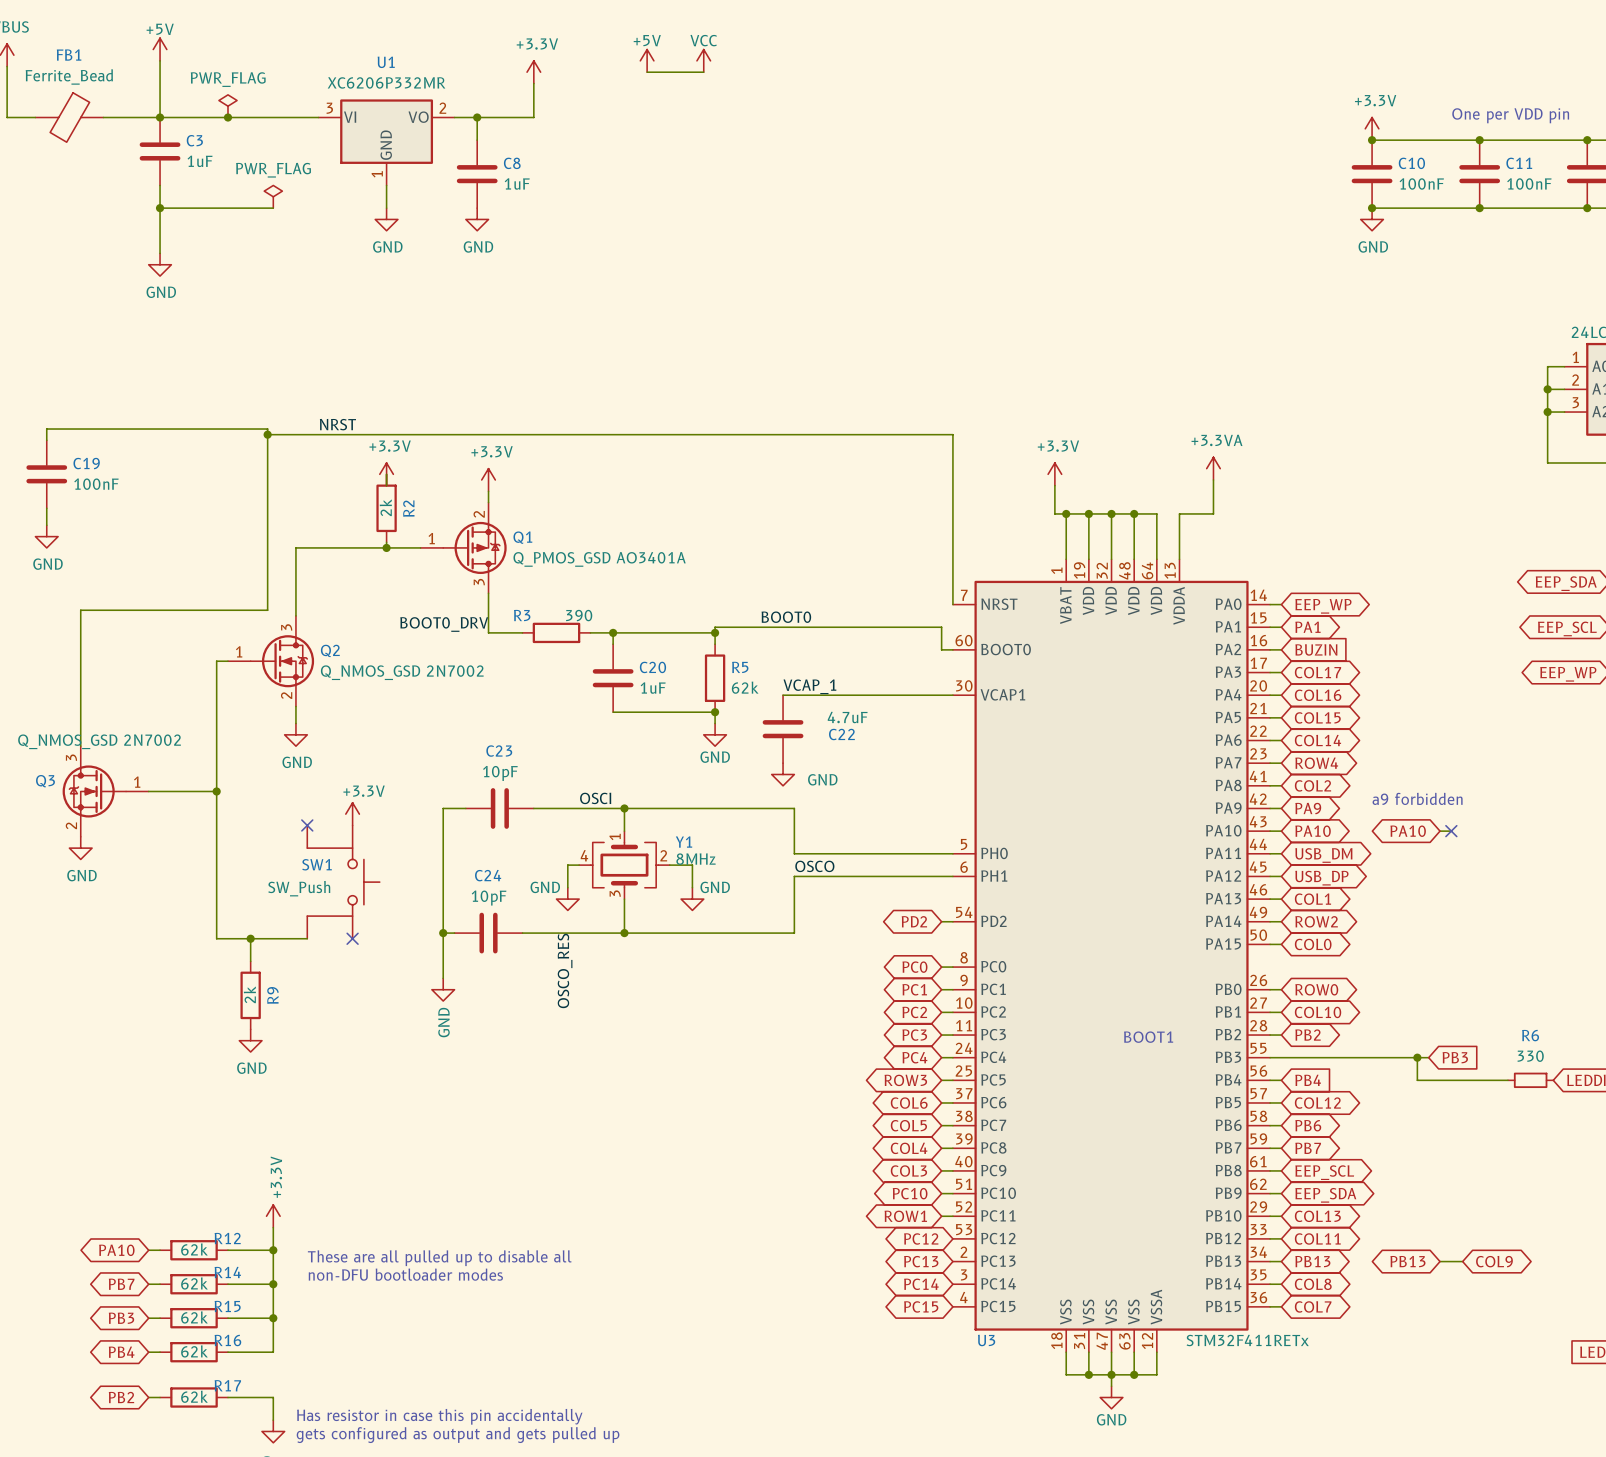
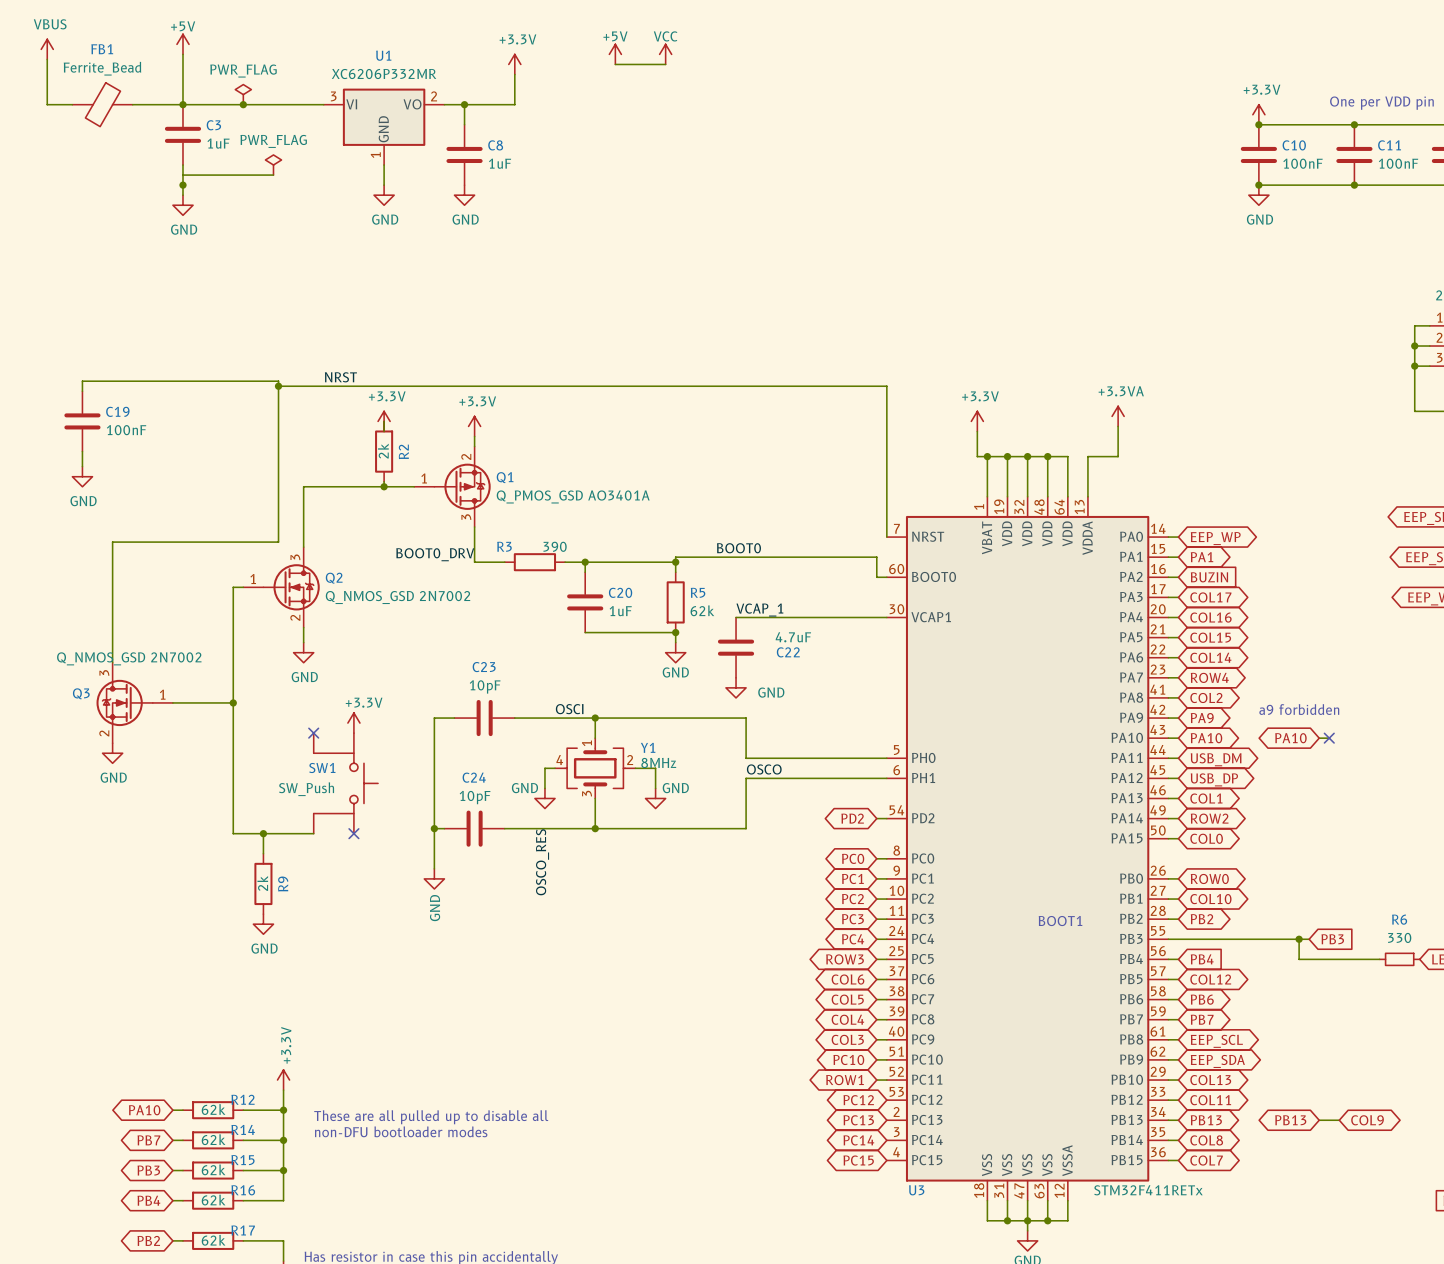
wire: none -> (182, 175) (273, 175)
power symbol position: PWR_FLAG (273, 196) -> PWR_FLAG (273, 165)
wire: (160, 208) (273, 208) -> none
wire: (160, 219) (160, 253) -> none
power symbol position: GND (160, 264) -> GND (182, 205)

